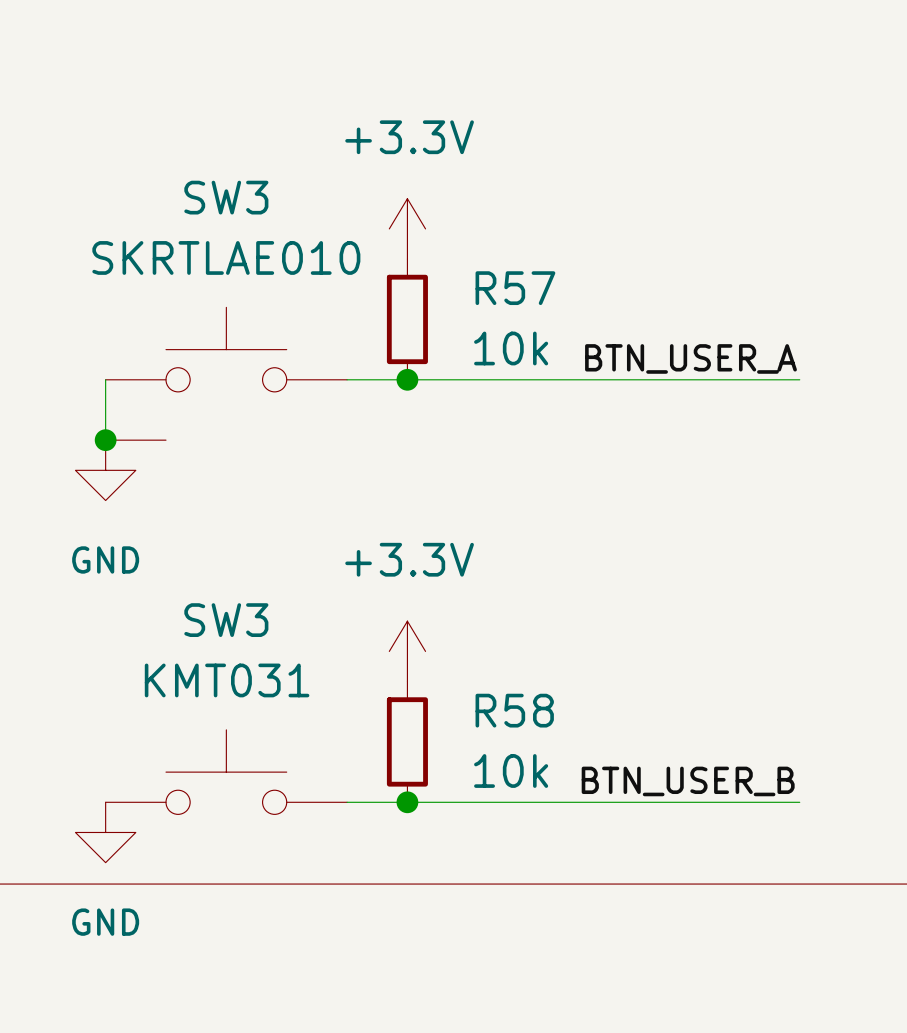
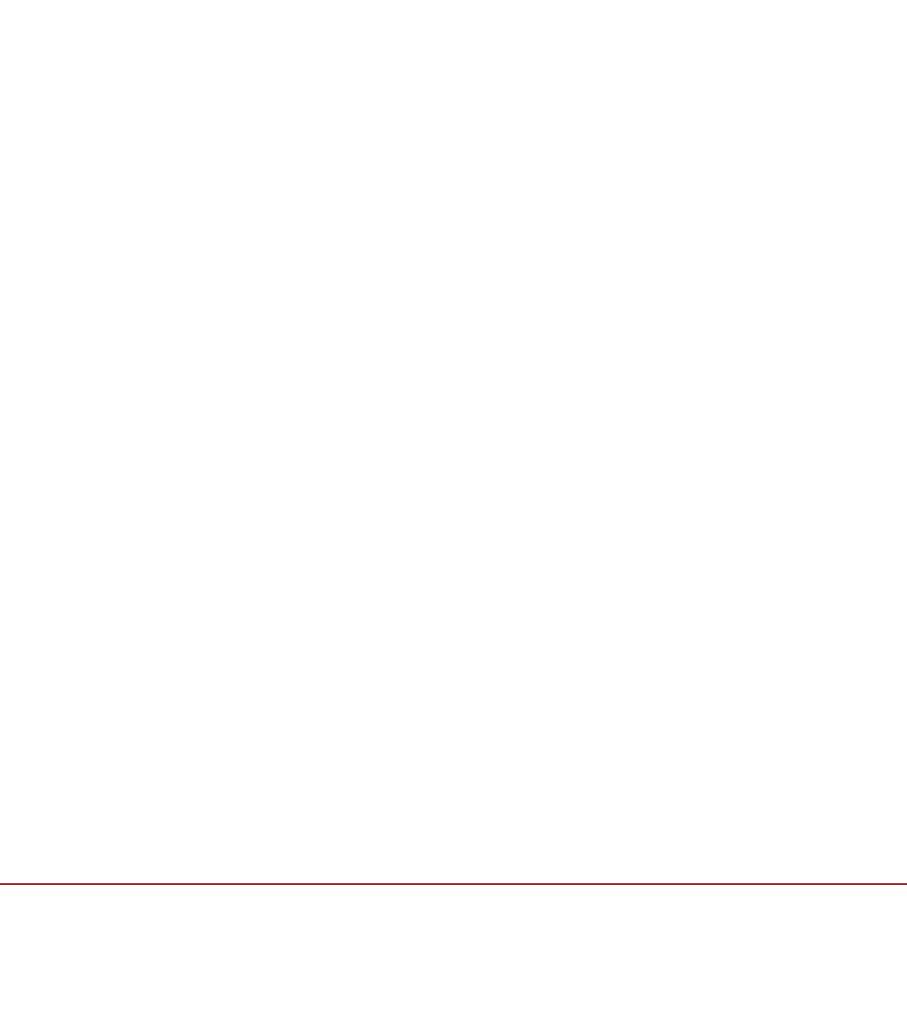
power symbol: +3.3V (407, 228) -> none
R57: 10k (407, 319) -> none
label: BTN_USER_A (691, 358) -> none
SW3: SKRTLAE010 (226, 373) -> none
wire: (105, 379) (105, 440) -> none
wire: (347, 379) (799, 379) -> none
junction: (407, 379) -> none
junction: (105, 440) -> none
power symbol: GND (105, 470) -> none
power symbol: +3.3V (407, 651) -> none
R58: 10k (407, 741) -> none
SW3: KMT031 (226, 772) -> none
label: BTN_USER_B (688, 781) -> none
wire: (347, 802) (799, 802) -> none
junction: (407, 802) -> none
power symbol: GND (105, 832) -> none

